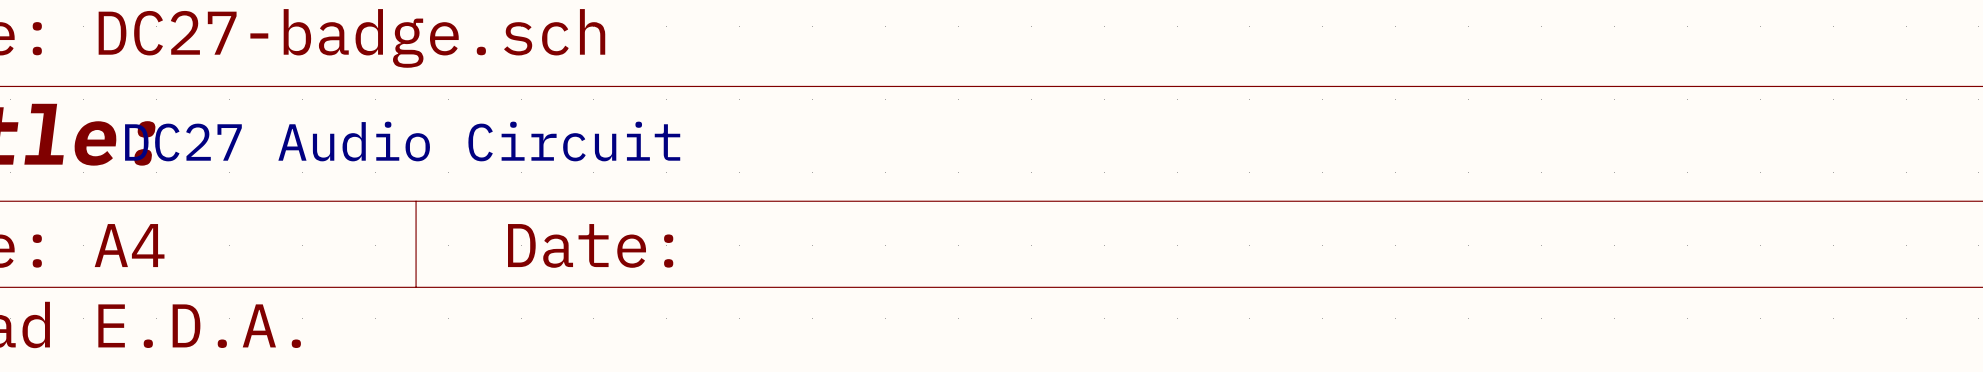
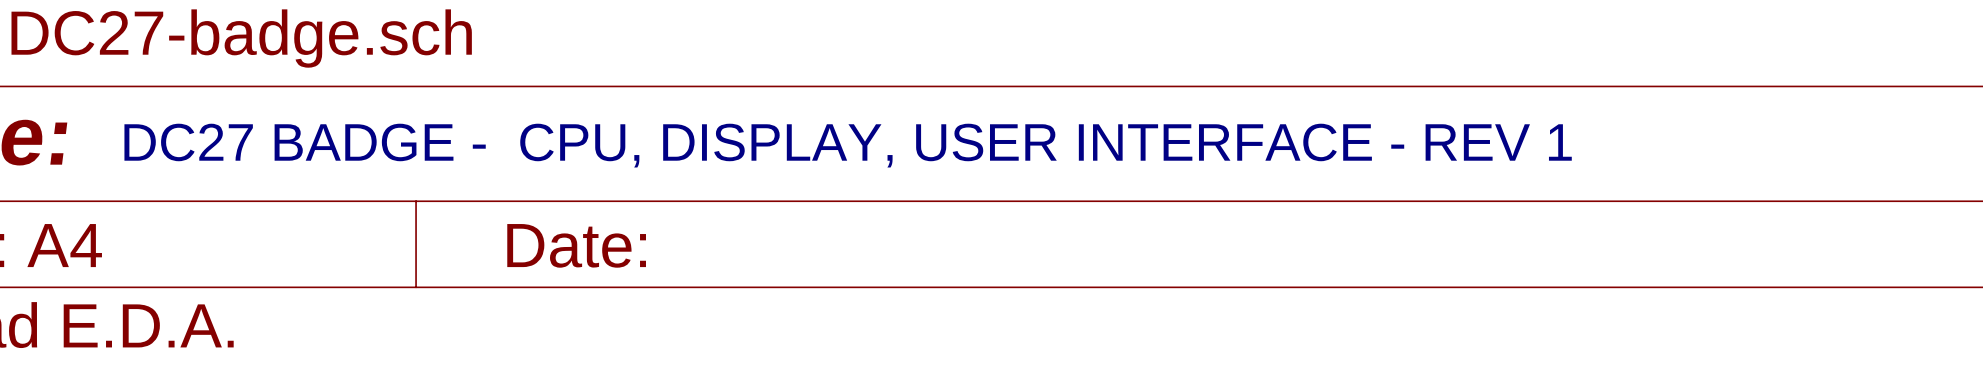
text: DC27 Audio Circuit (402, 141) -> DC27 BADGE - CPU, DISPLAY, USER INTERFACE - REV 1 (848, 145)

